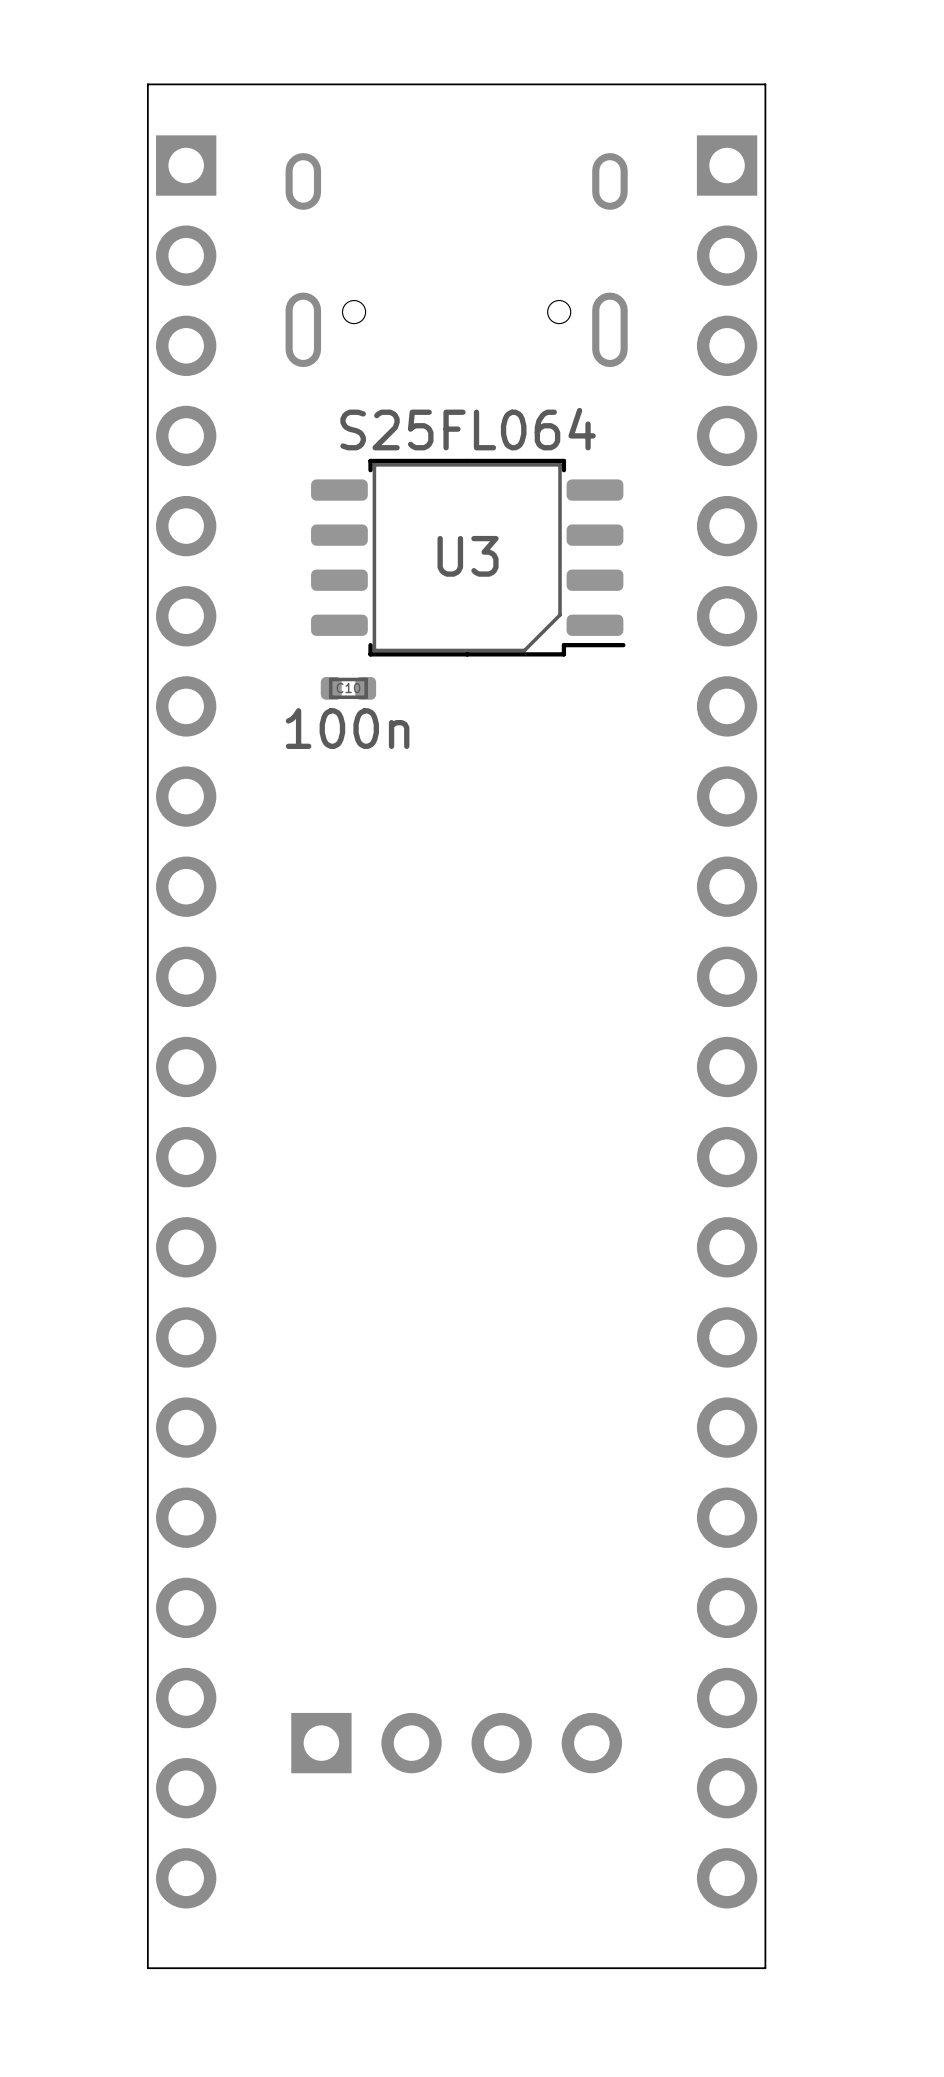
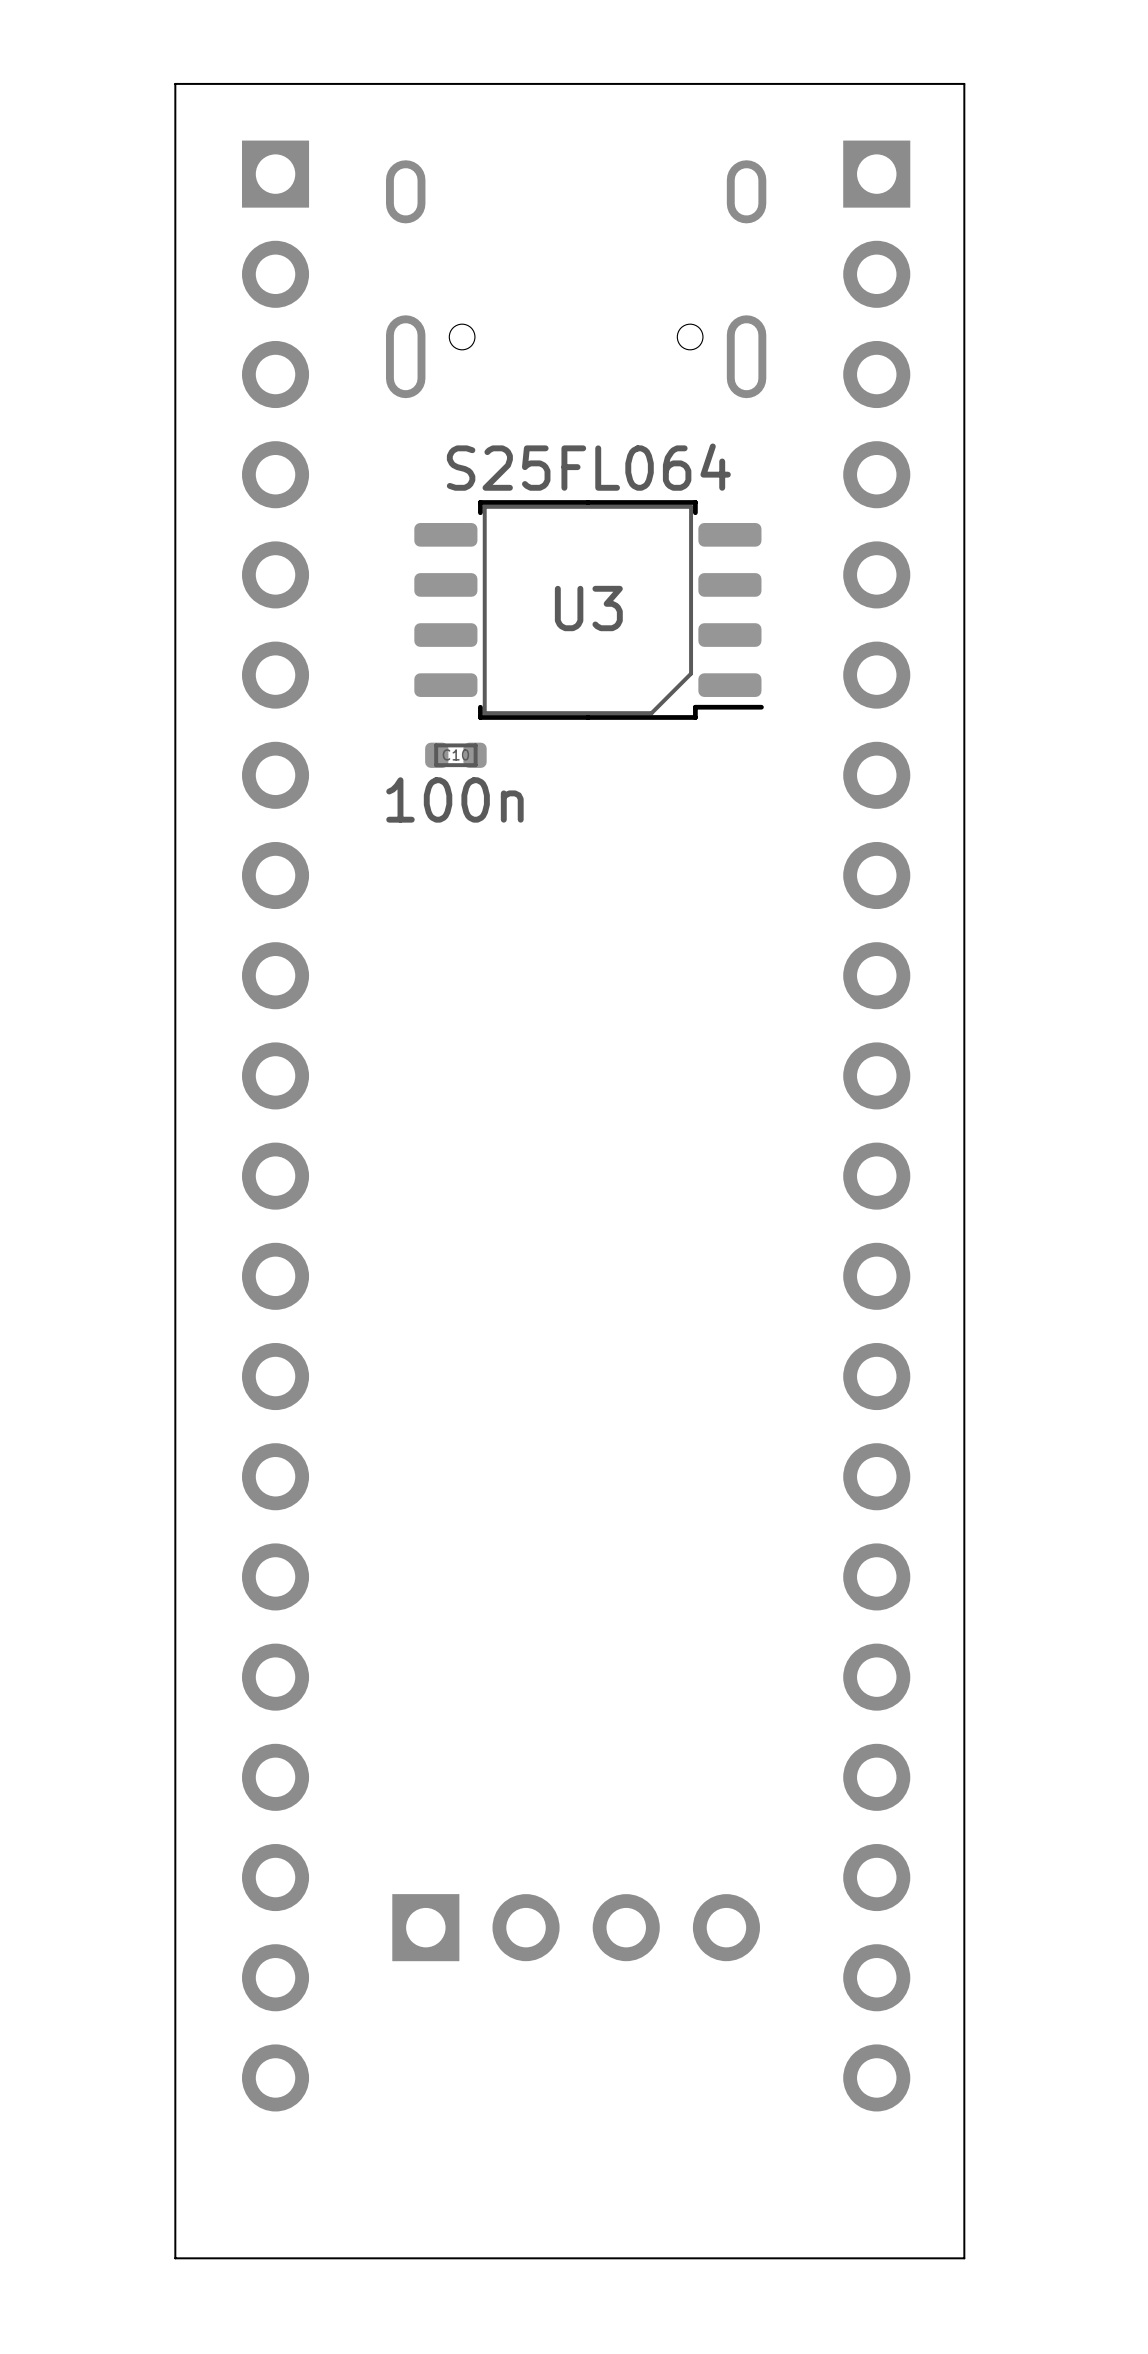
board edge: (765, 84) (765, 1968) (147, 1968) (147, 84) -> (919, 83) (964, 83) (964, 2258) (175, 2258) (175, 83) (232, 83)

